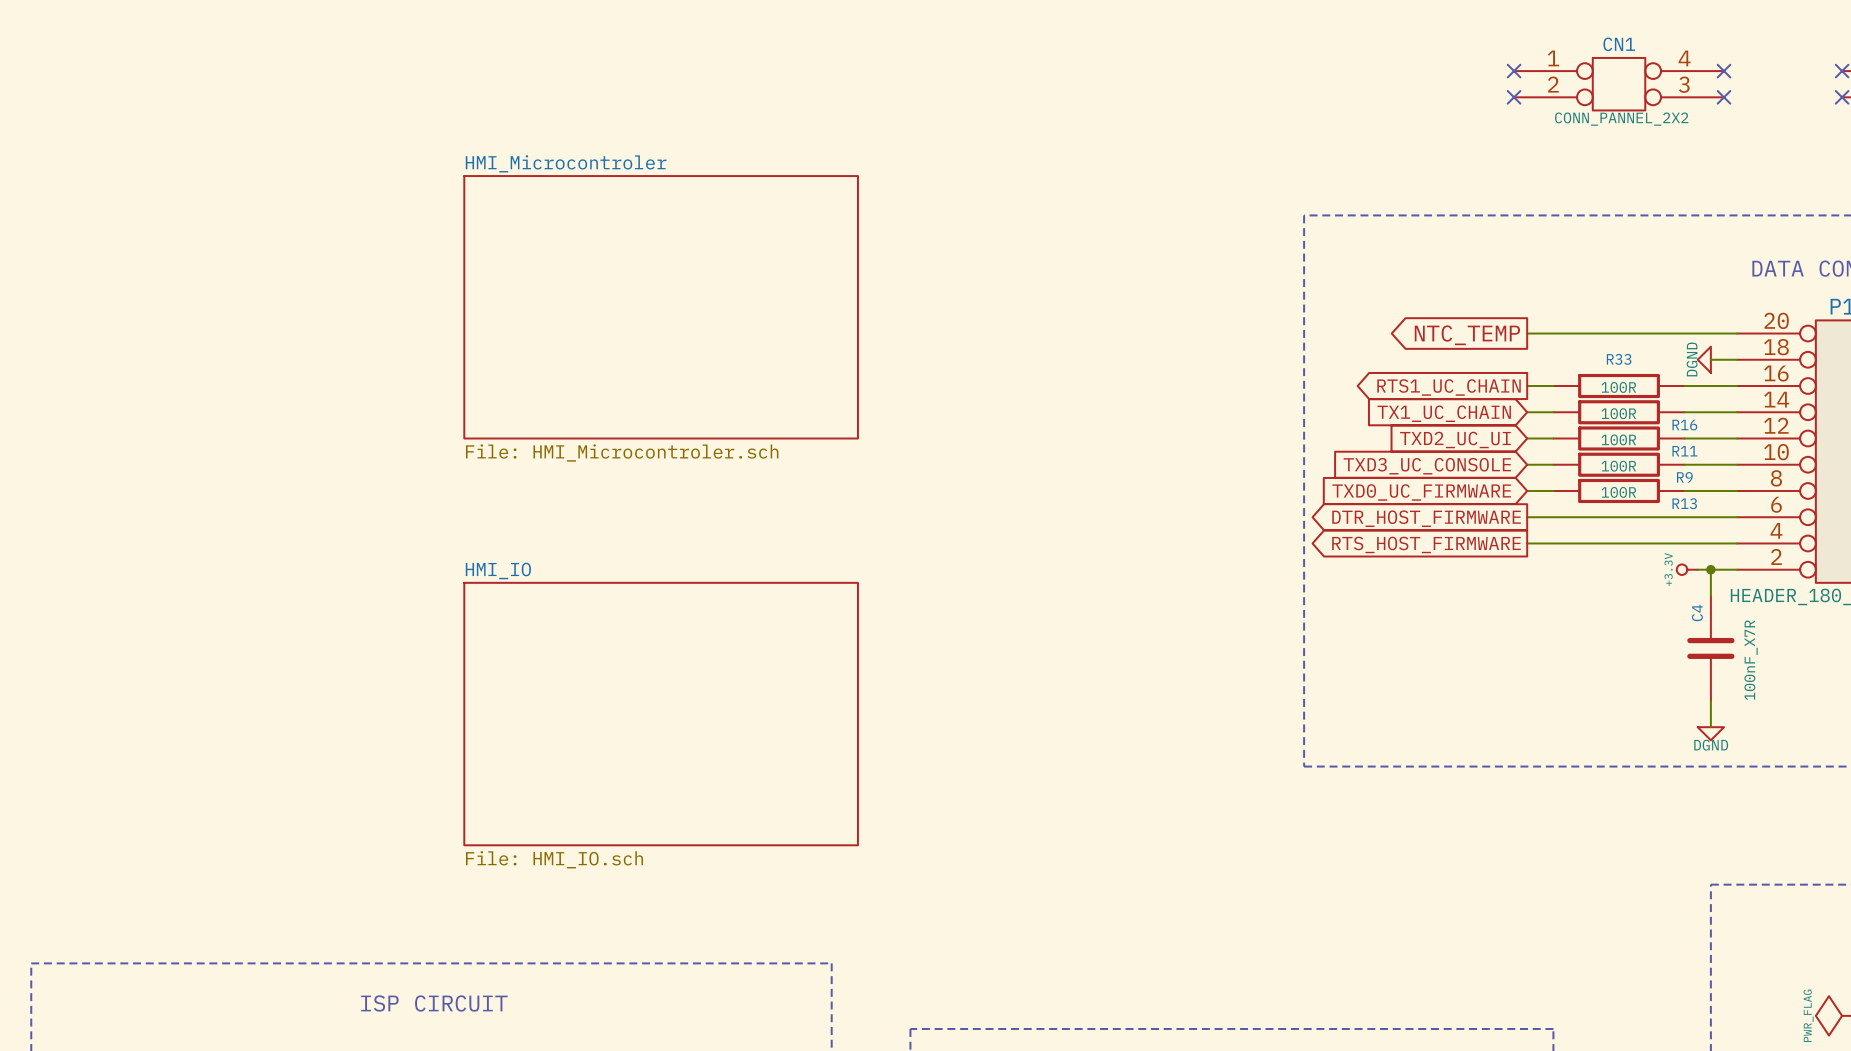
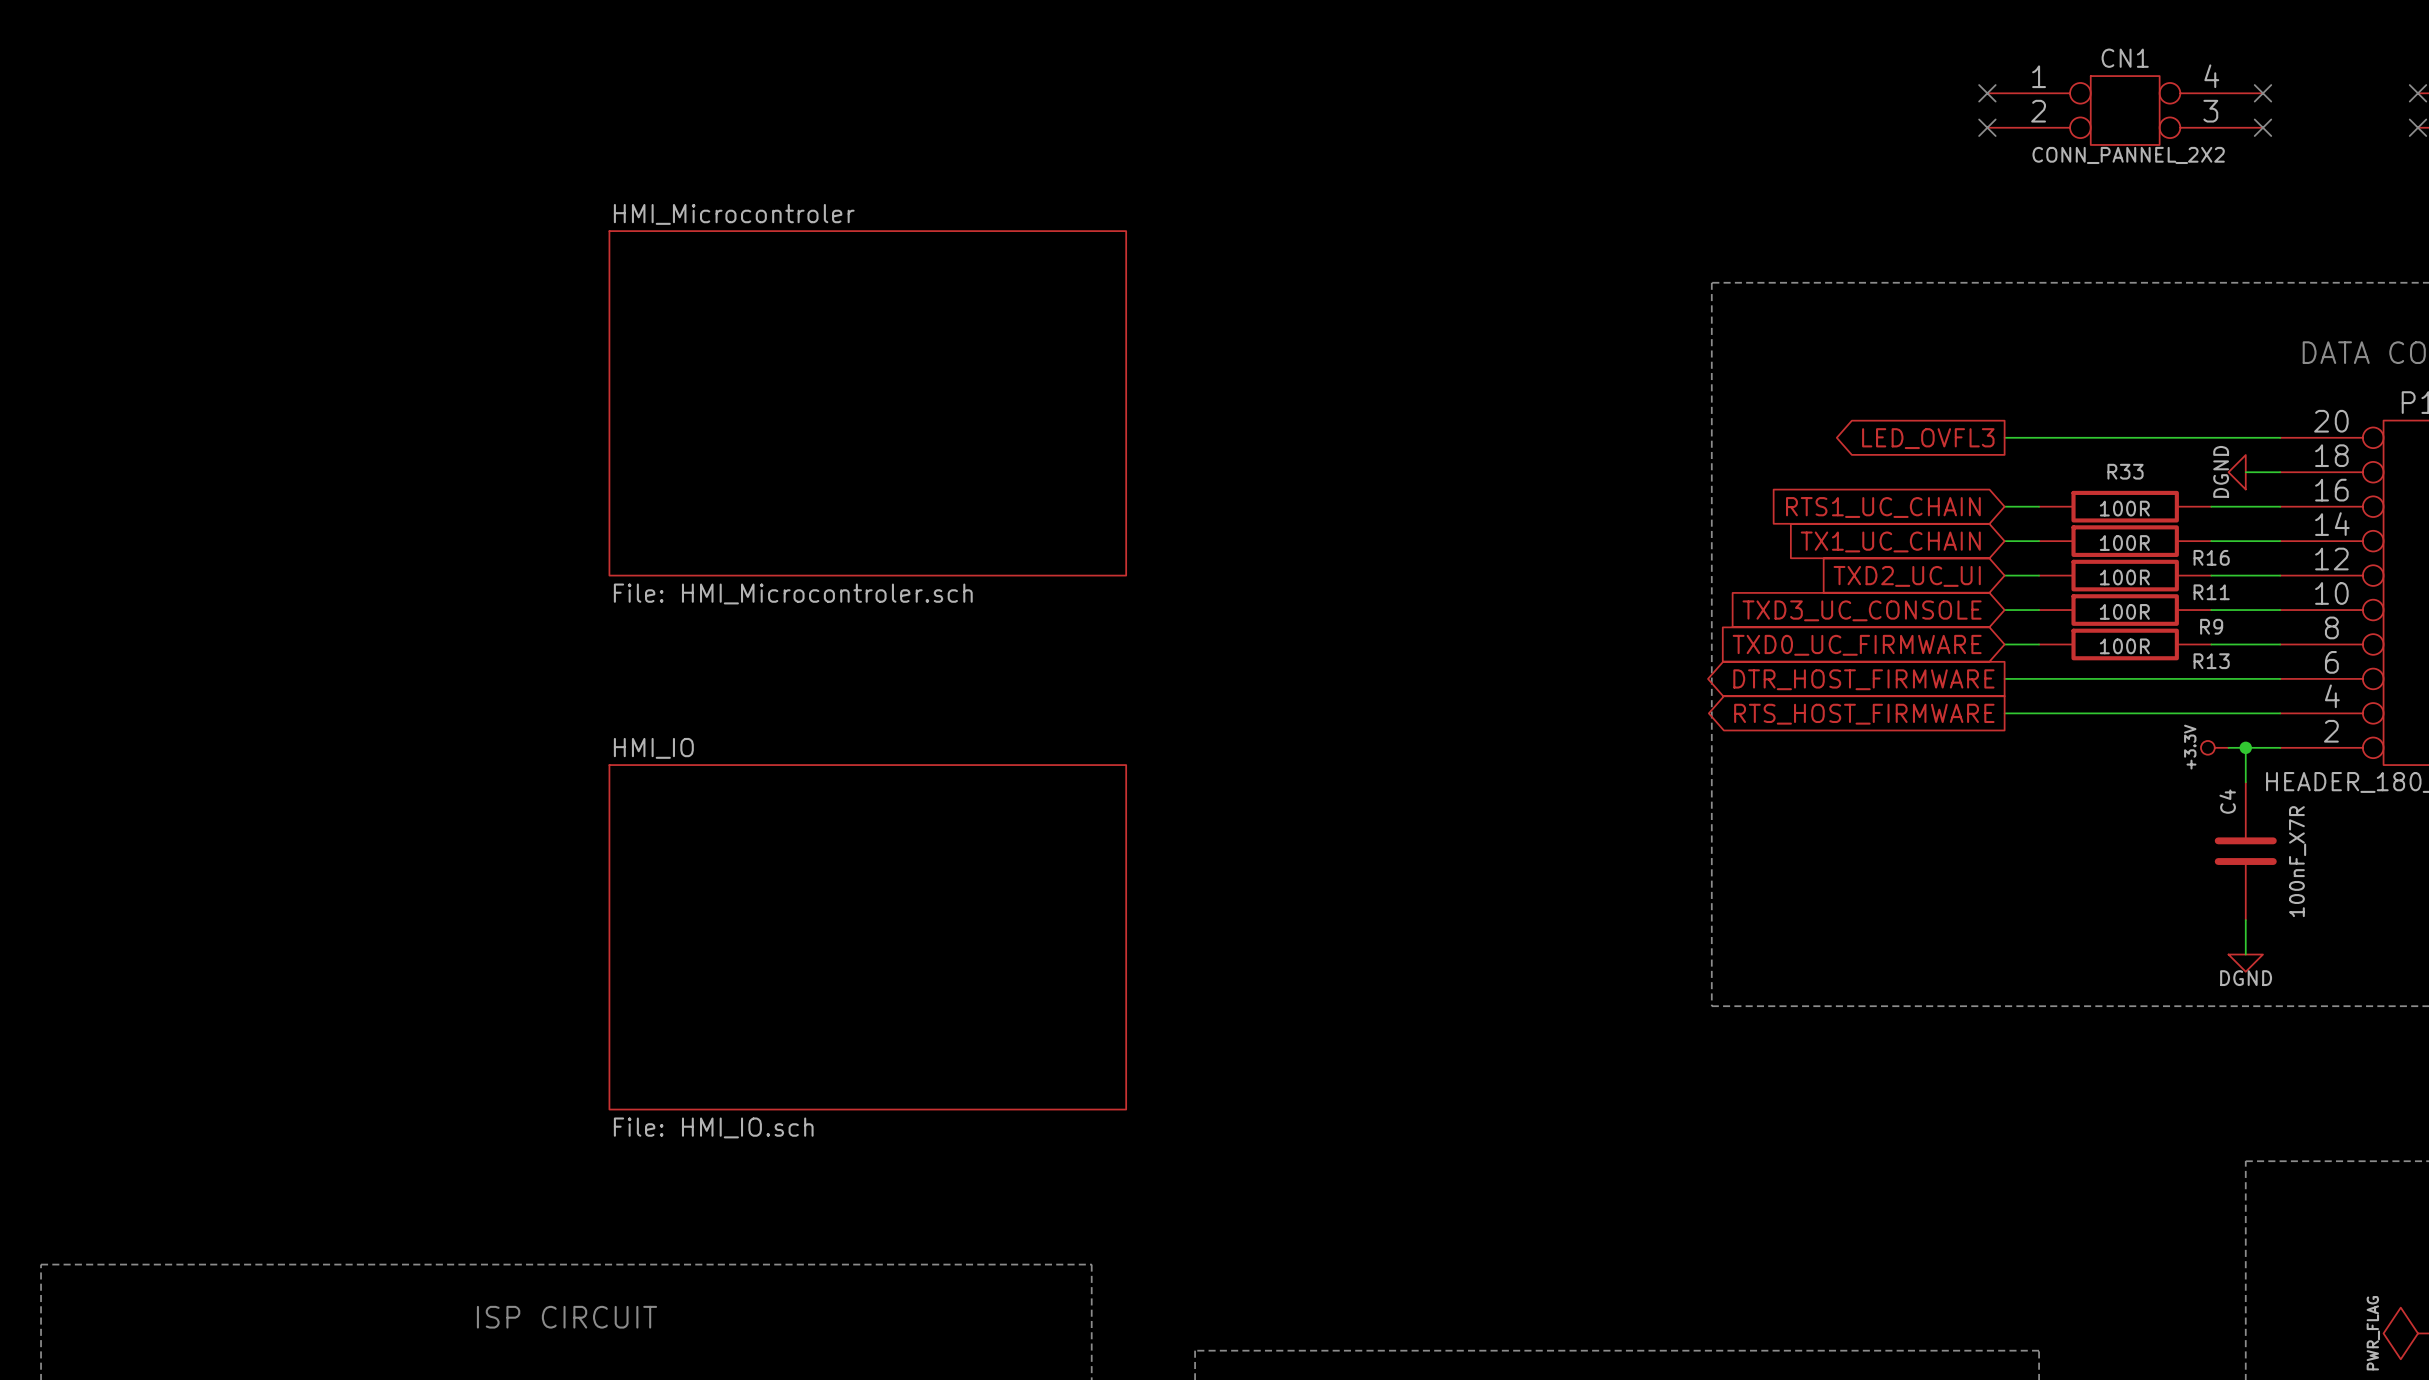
global label: NTC_TEMP (1467, 335) -> LED_OVFL3 (1928, 438)
global label shape: output (1449, 387) -> input (1883, 507)

